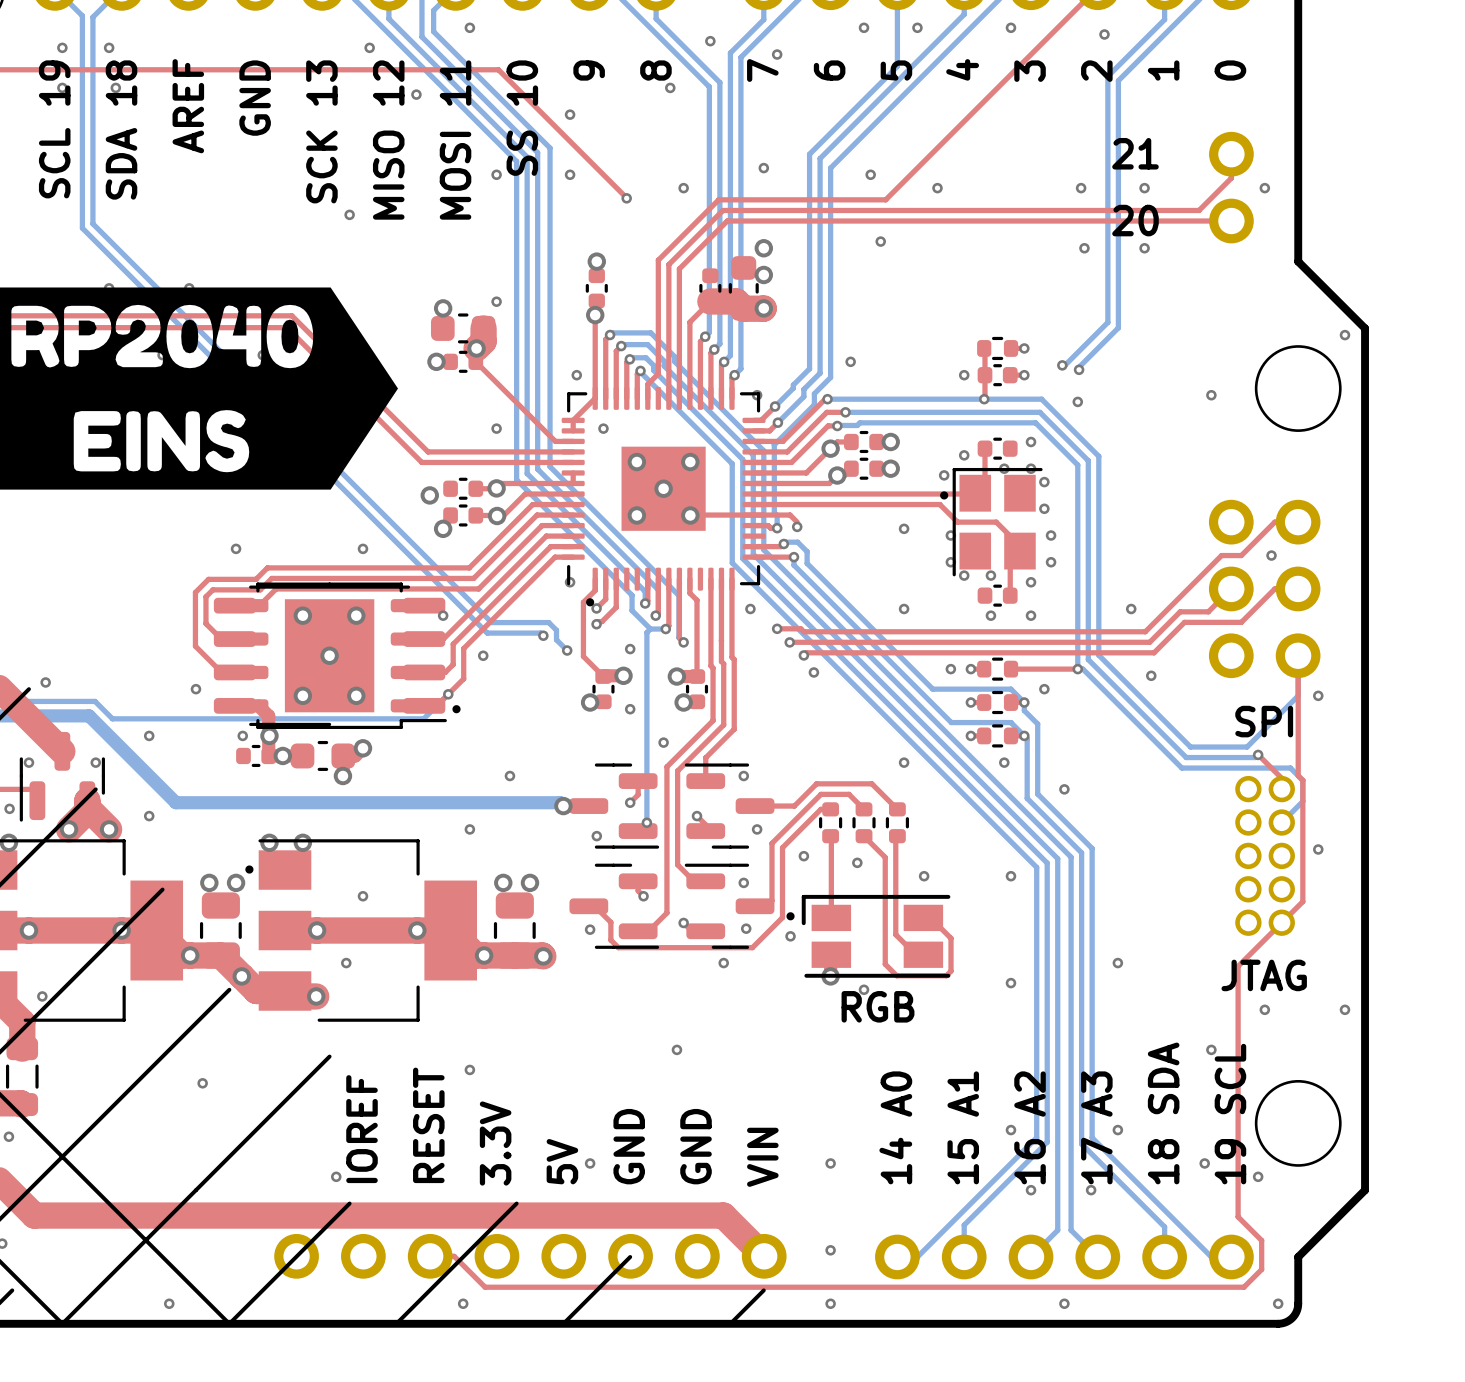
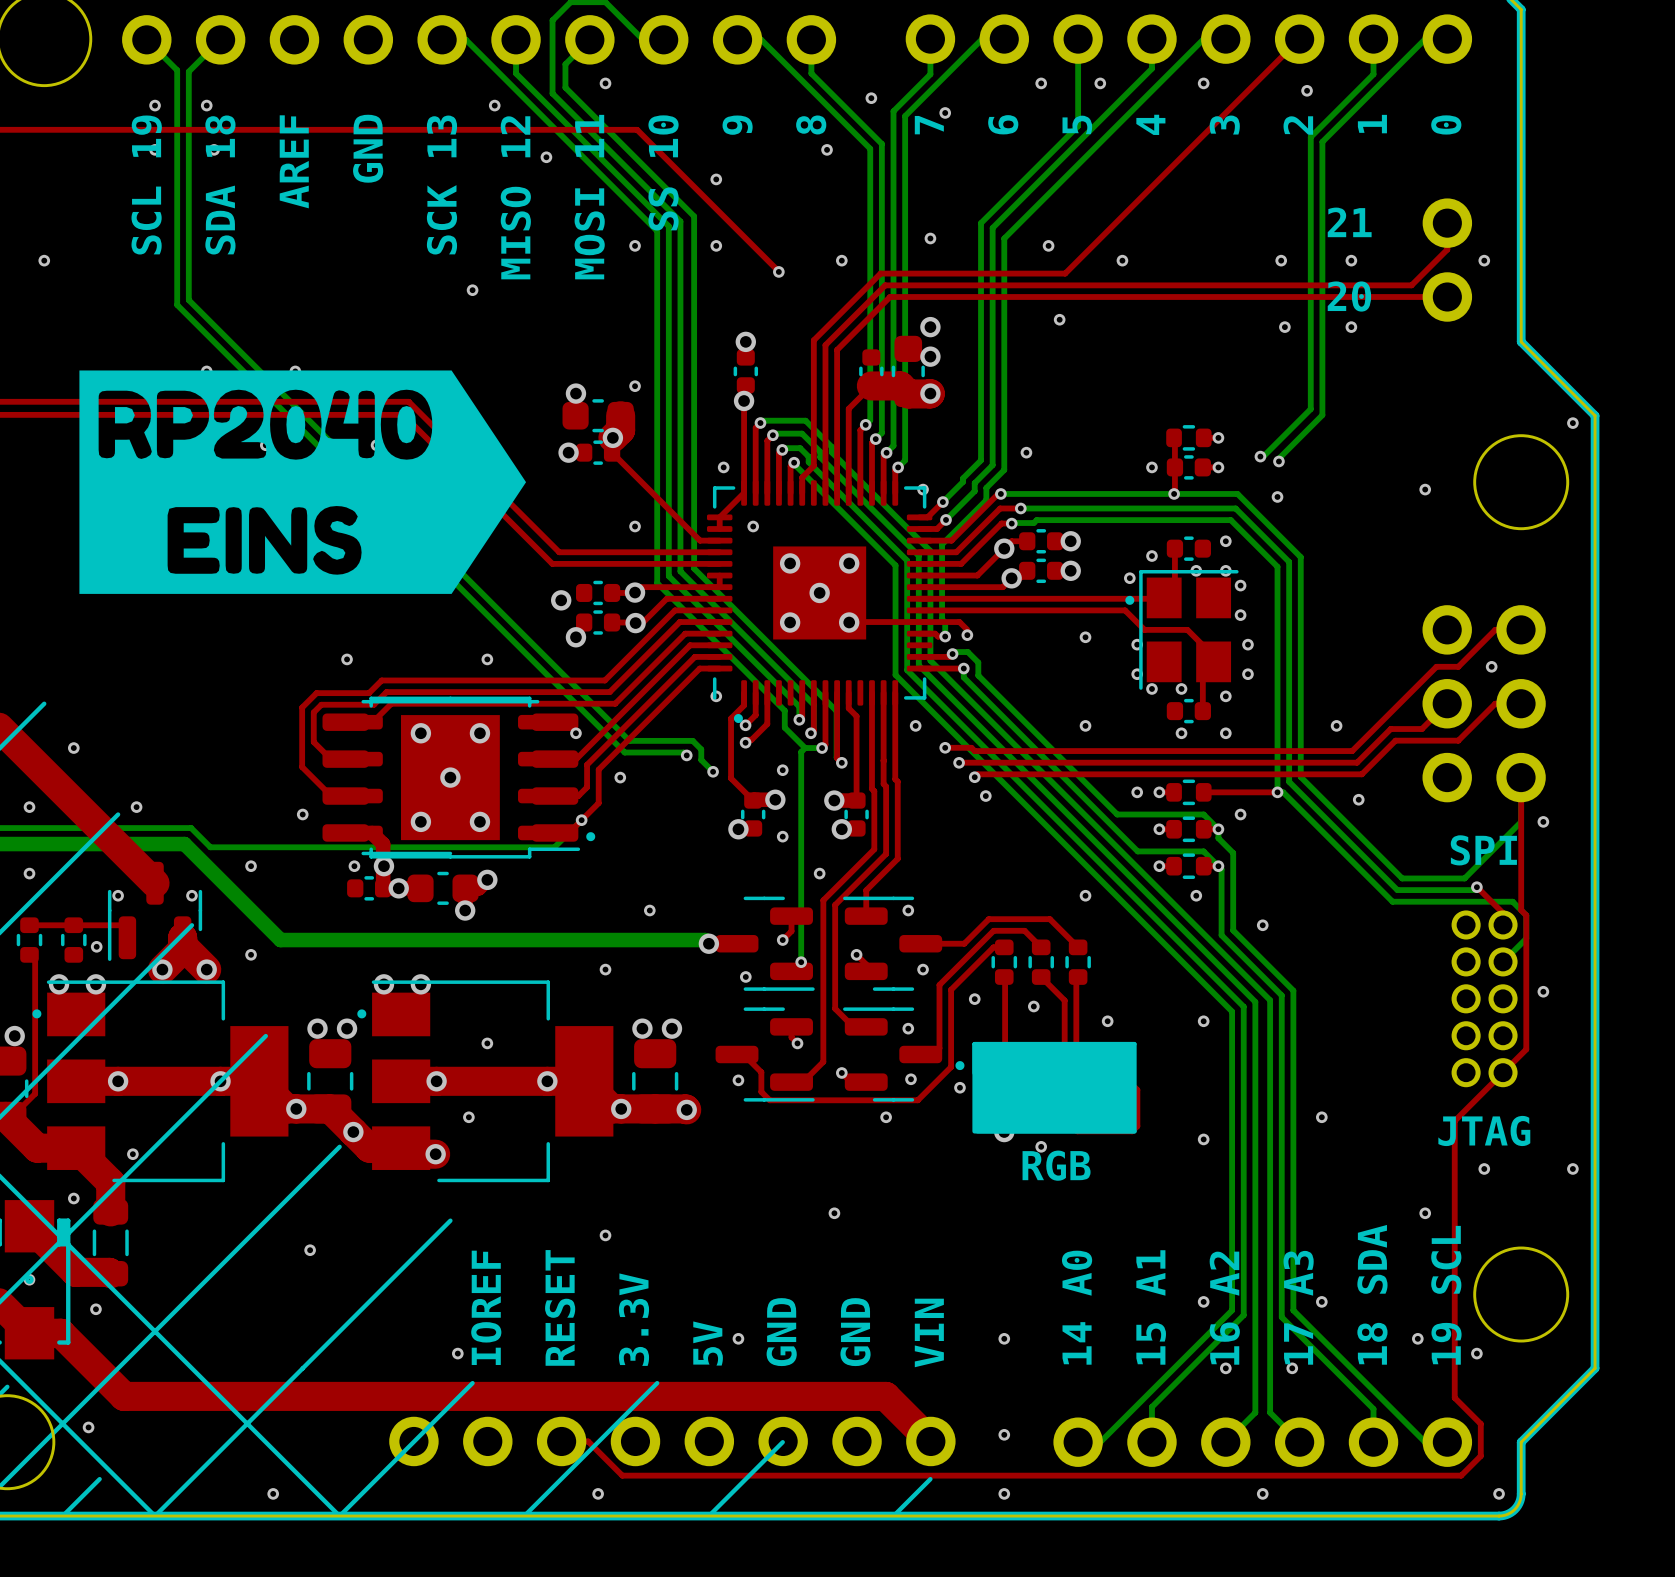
drawing: none -> [972, 1041, 1137, 1134]

